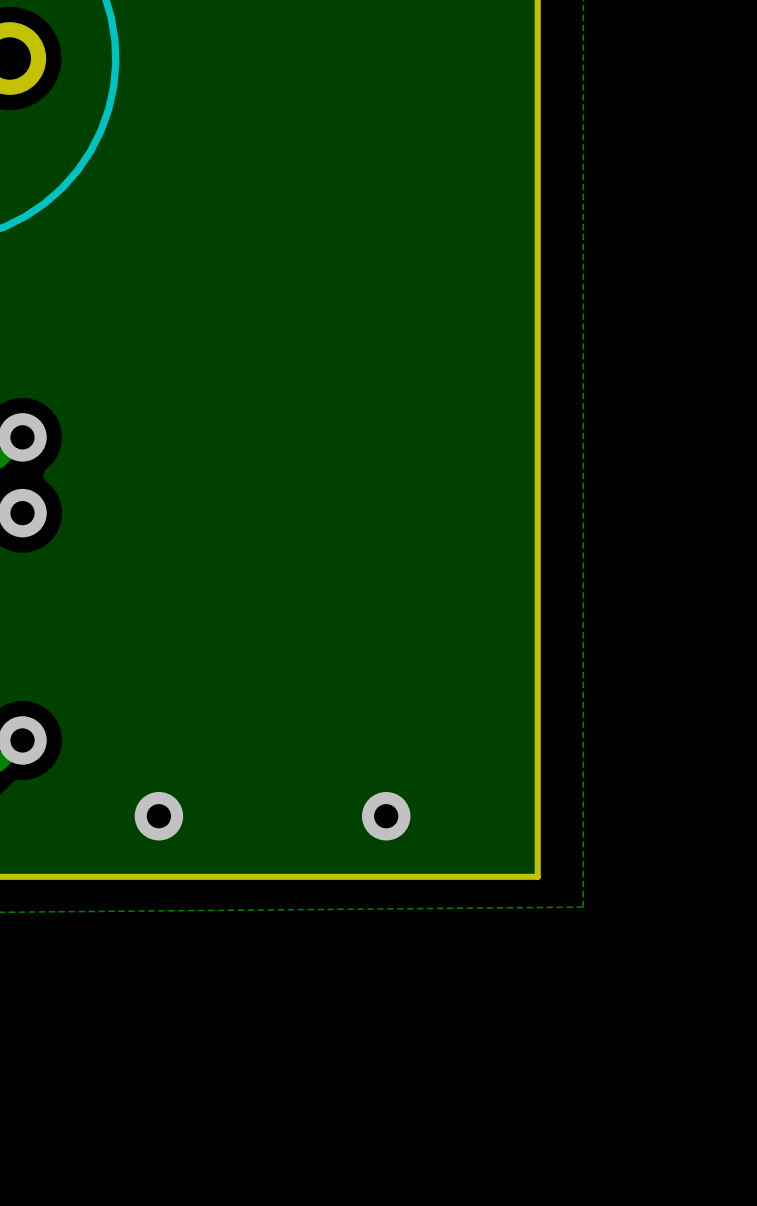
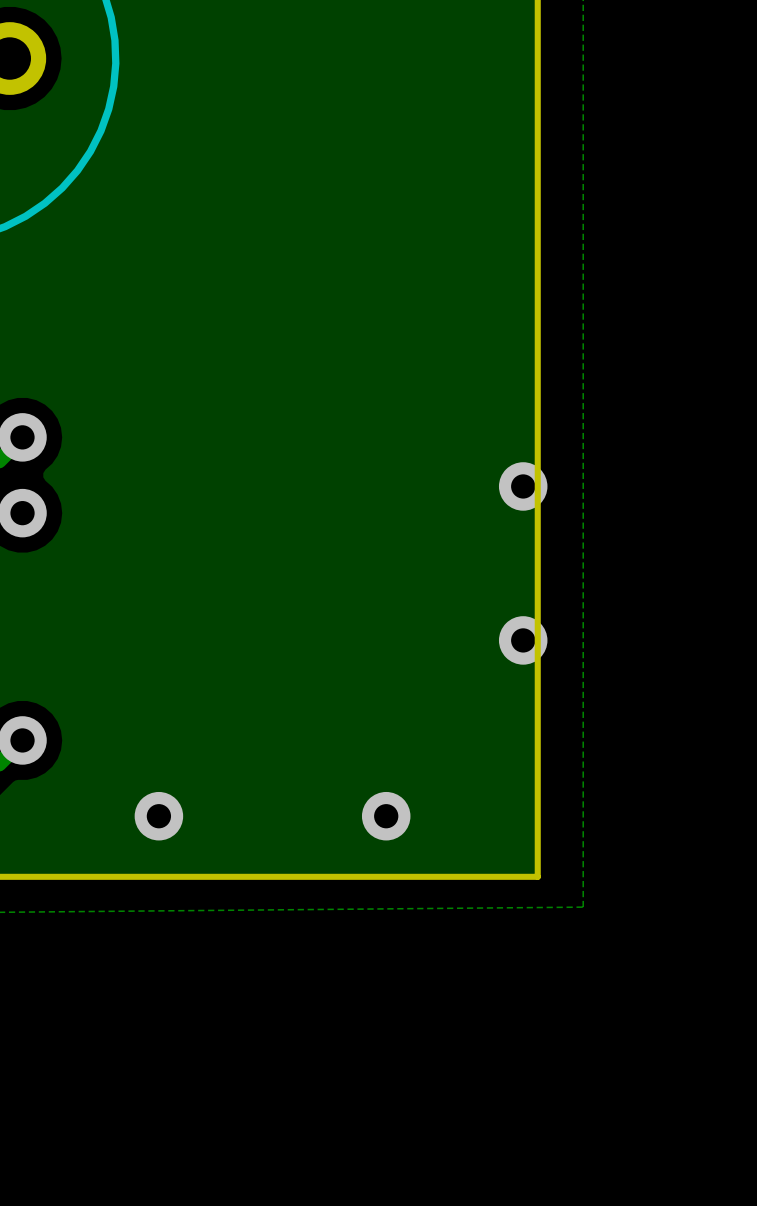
via: none -> (523, 486)
via: none -> (523, 640)

